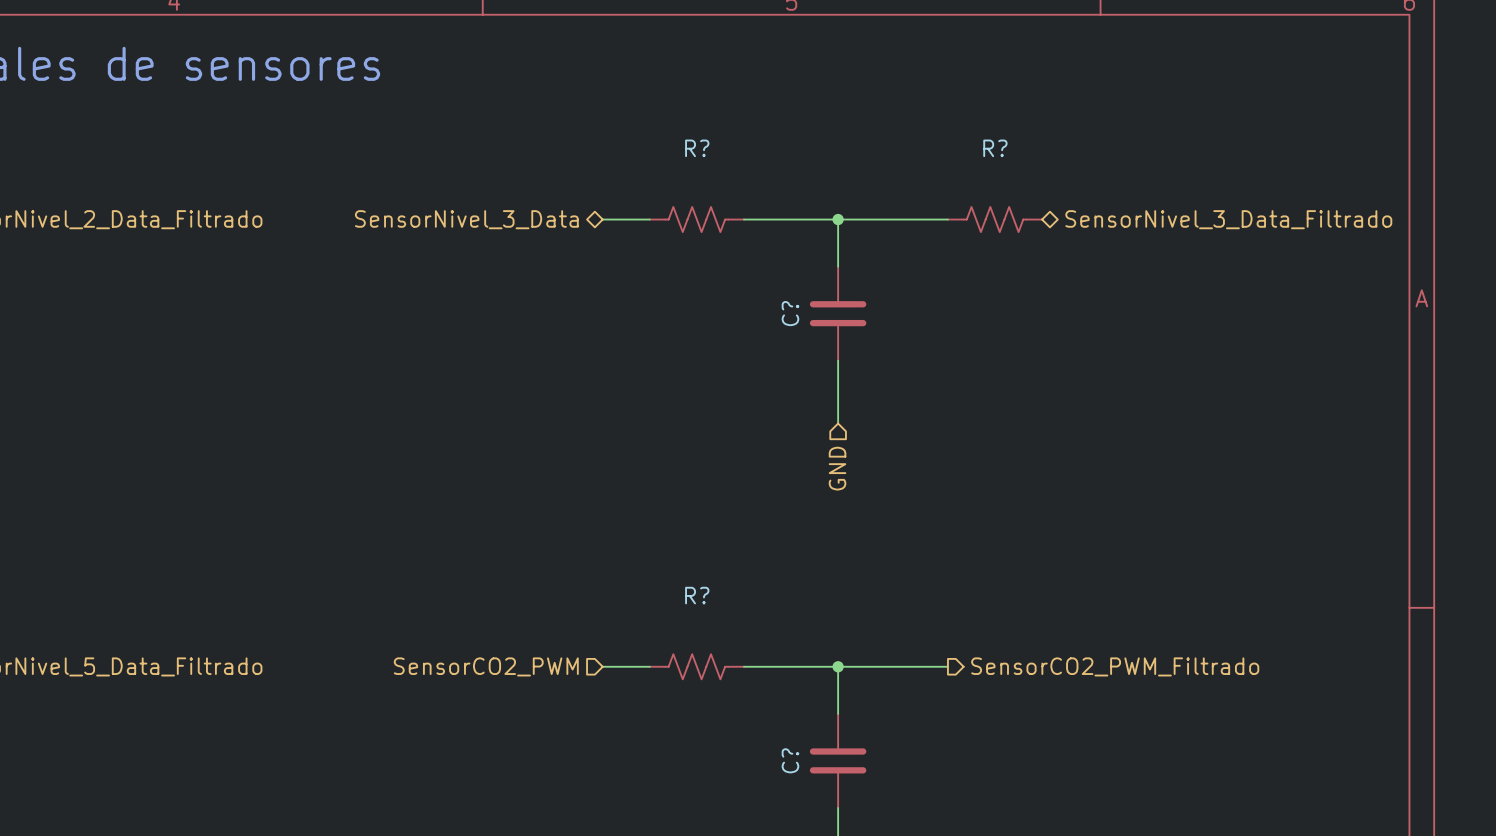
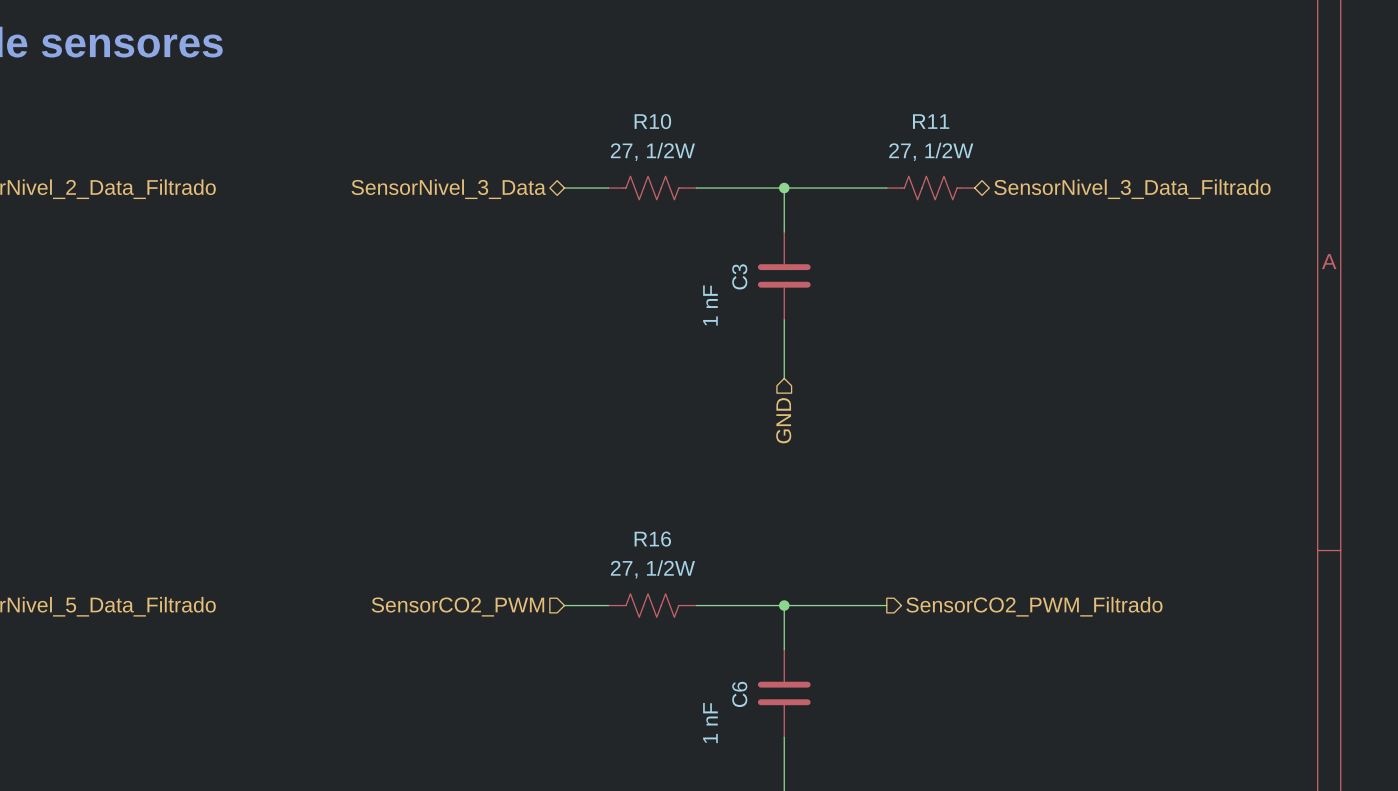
R? name: R? (697, 148) -> R10 (652, 121)
R? name: R? (995, 148) -> R11 (931, 121)
R? value: none -> 27, 1/2W (652, 151)
R? value: none -> 27, 1/2W (931, 151)
C? name: C? (790, 313) -> C3 (739, 276)
C? value: none -> 1 nF (710, 305)
R? name: R? (697, 595) -> R16 (652, 539)
R? value: none -> 27, 1/2W (652, 569)
C? name: C? (790, 760) -> C6 (739, 694)
C? value: none -> 1 nF (710, 723)

